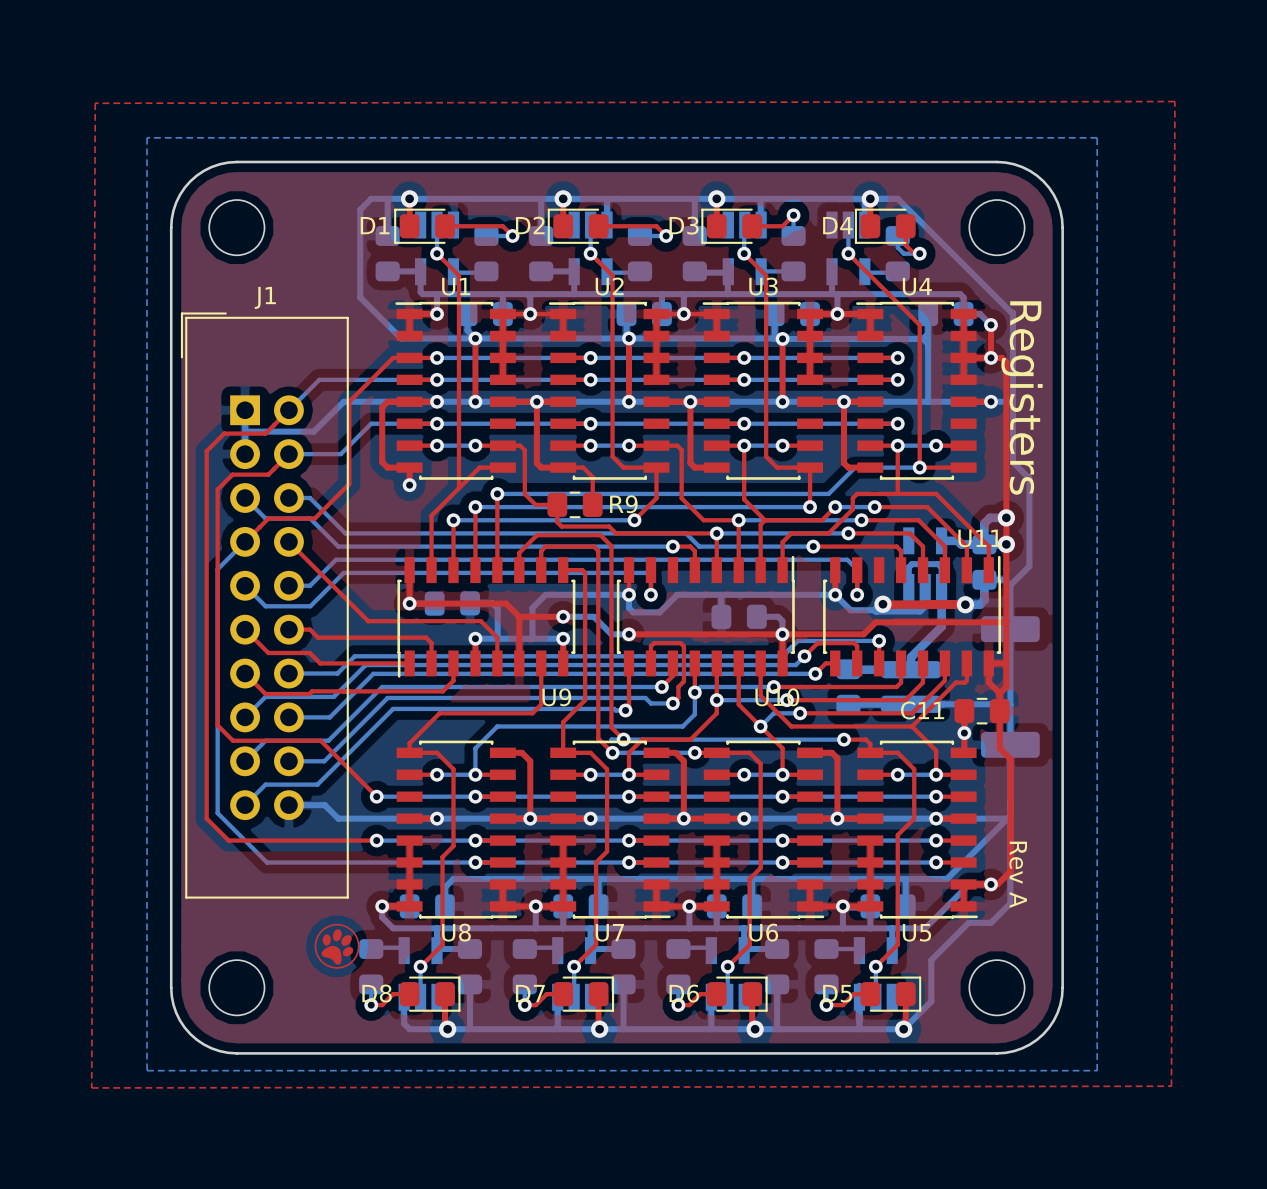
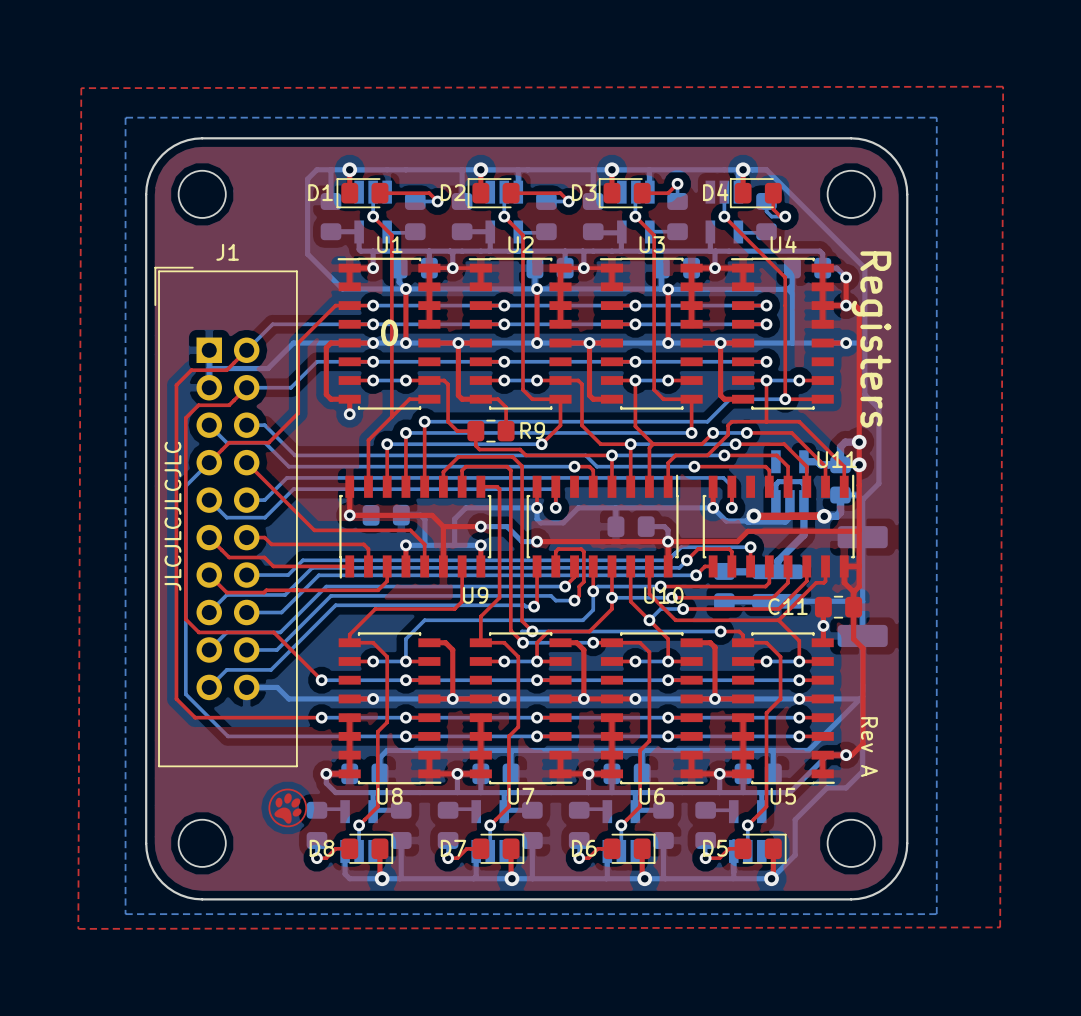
text: none -> 0 (389, 332)
text: none -> JLCJLCJLCJLC (172, 516)

